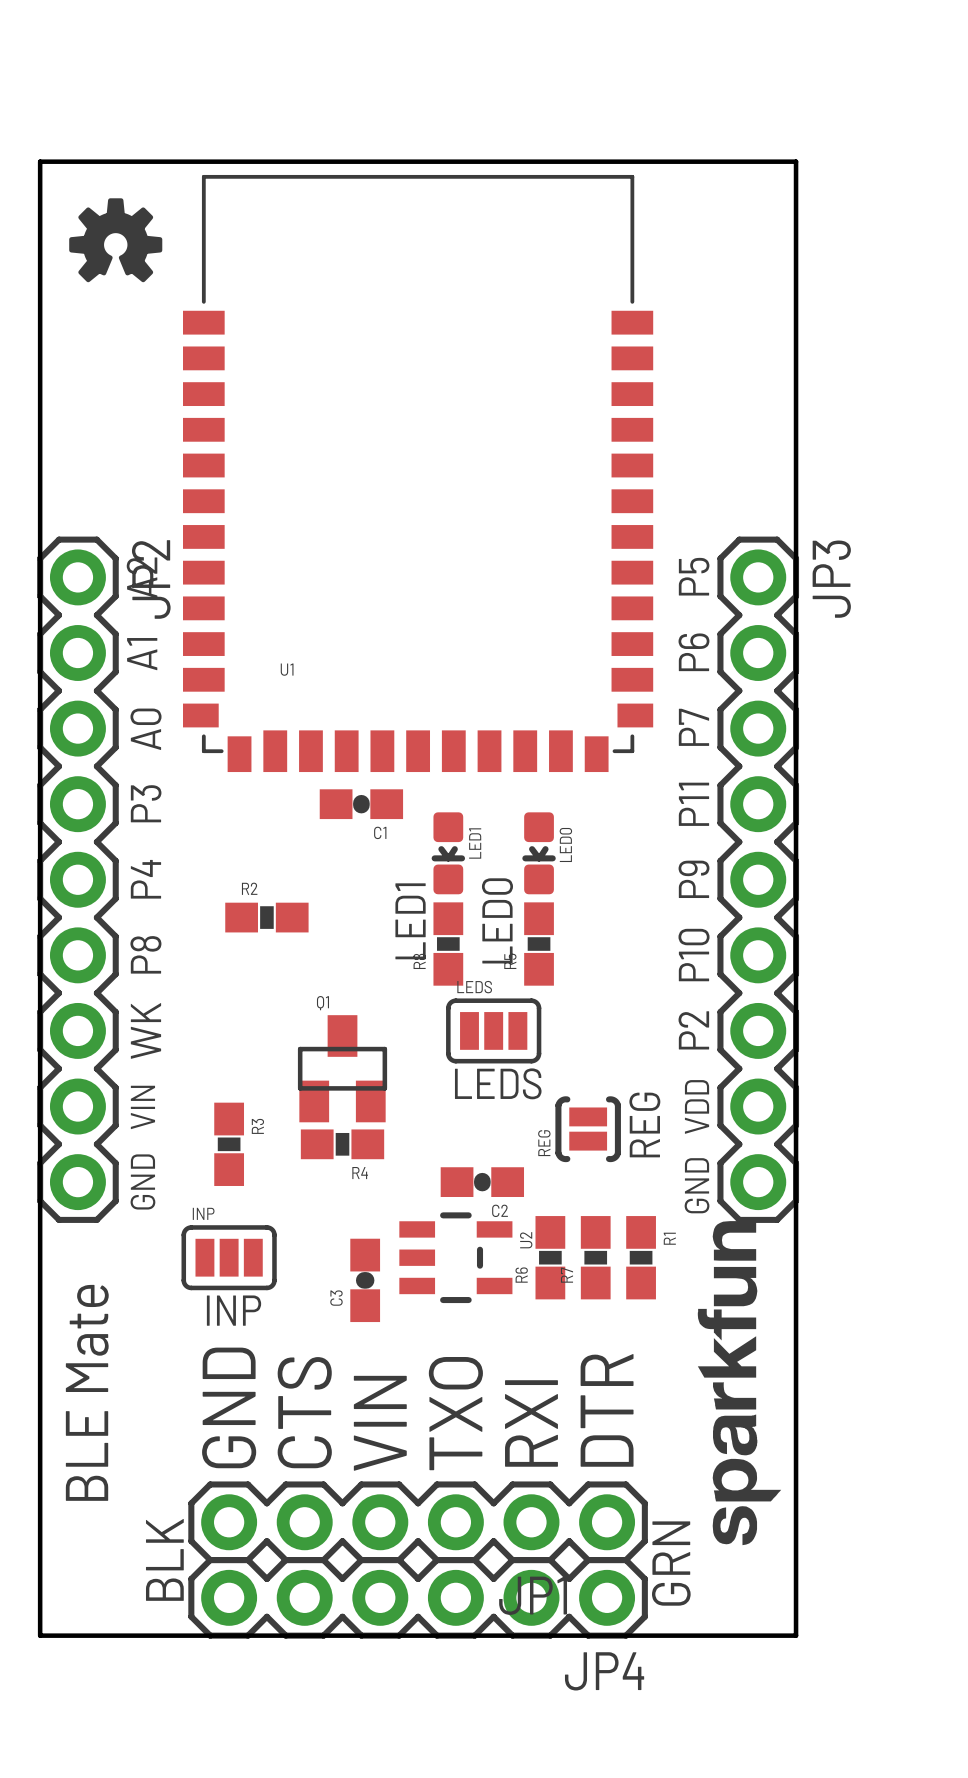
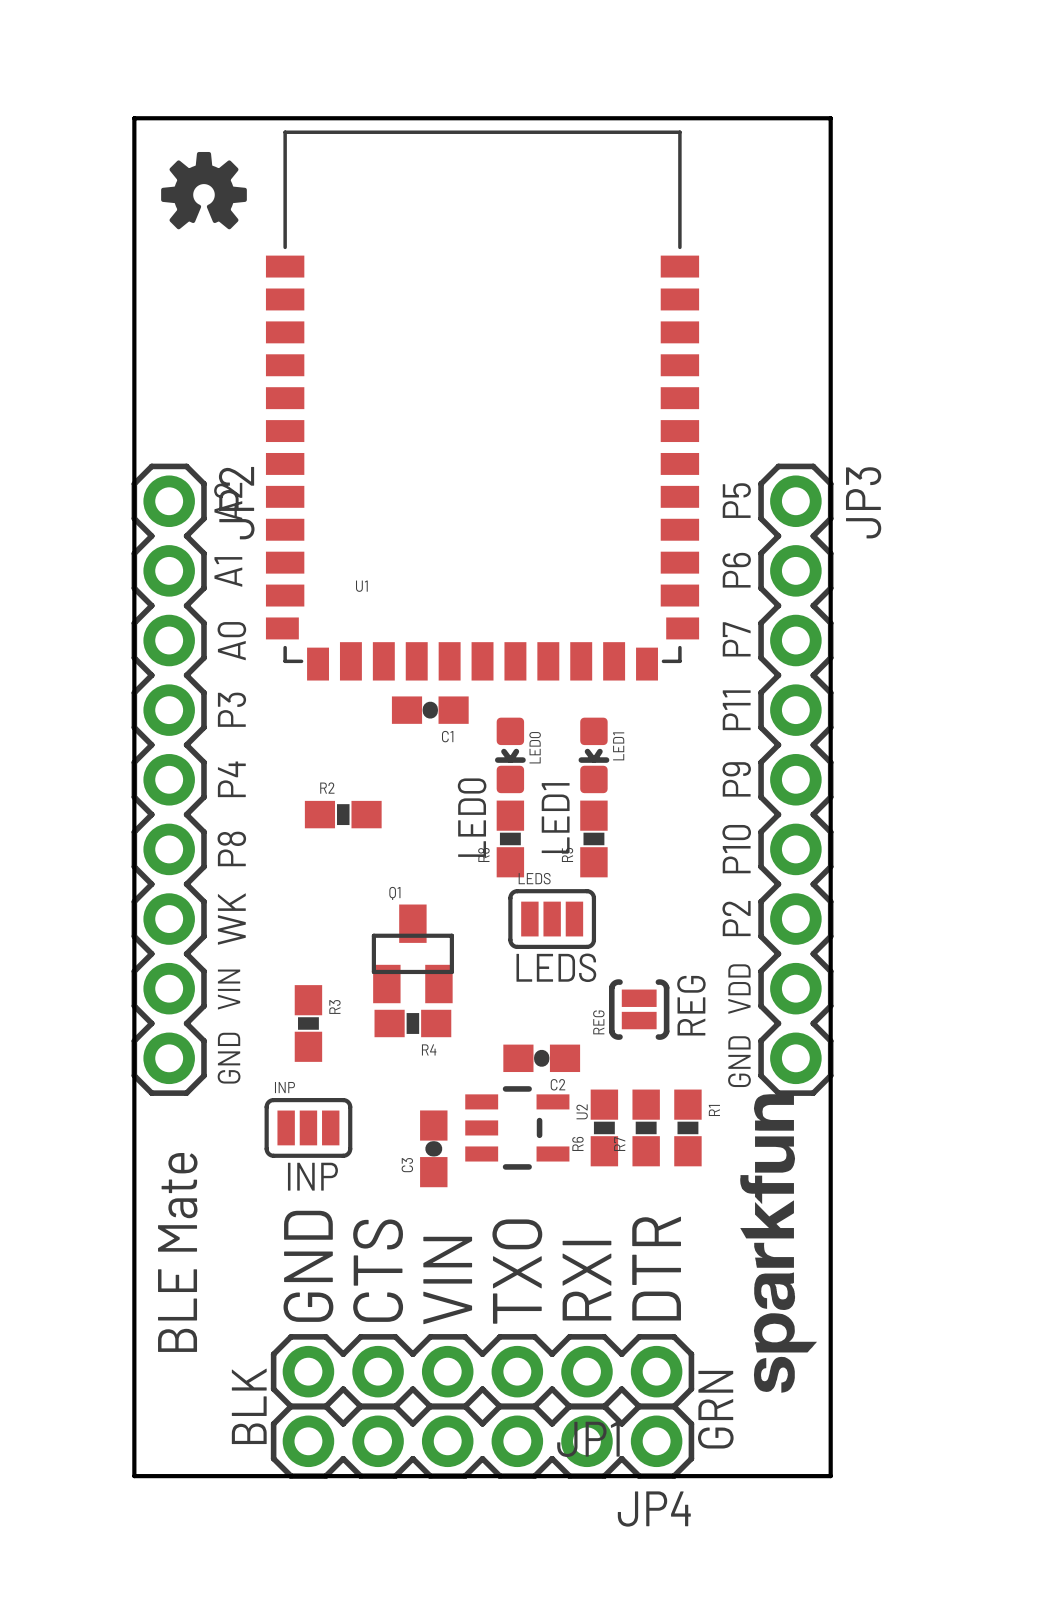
LED1 name: LED1 (475, 843) -> LED0 (535, 747)
LED0 name: LED0 (565, 844) -> LED1 (618, 746)
text: LED0 (497, 920) -> LED1 (555, 818)
text: LED1 (410, 921) -> LED0 (472, 817)

